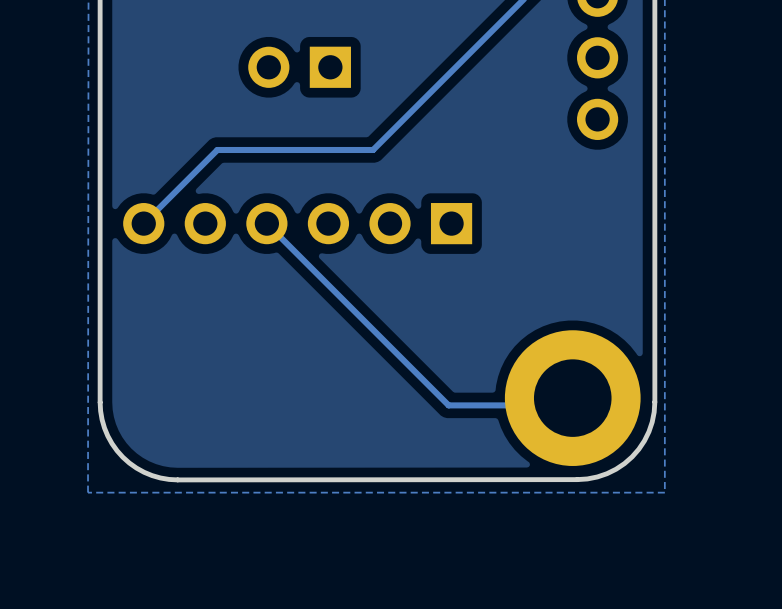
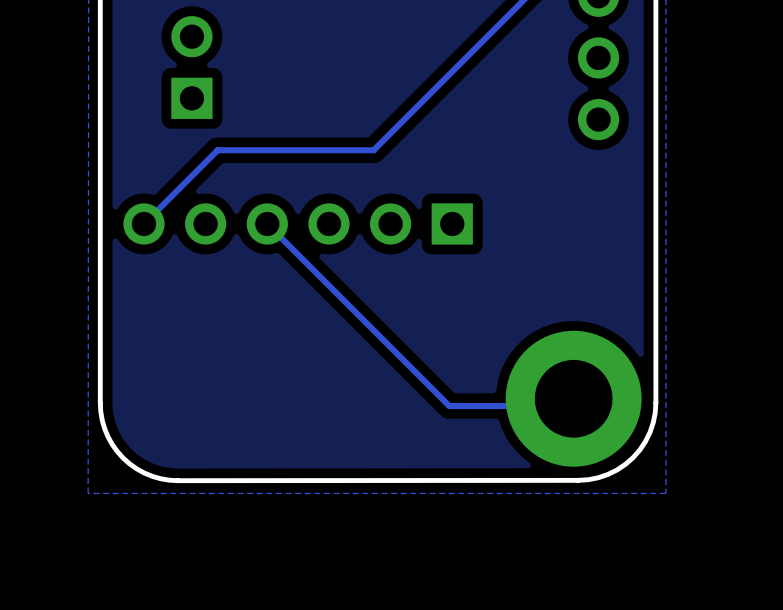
part rotation: 0° (299, 67) -> 90° clockwise (191, 67)
part position: (299, 67) -> (191, 67)

